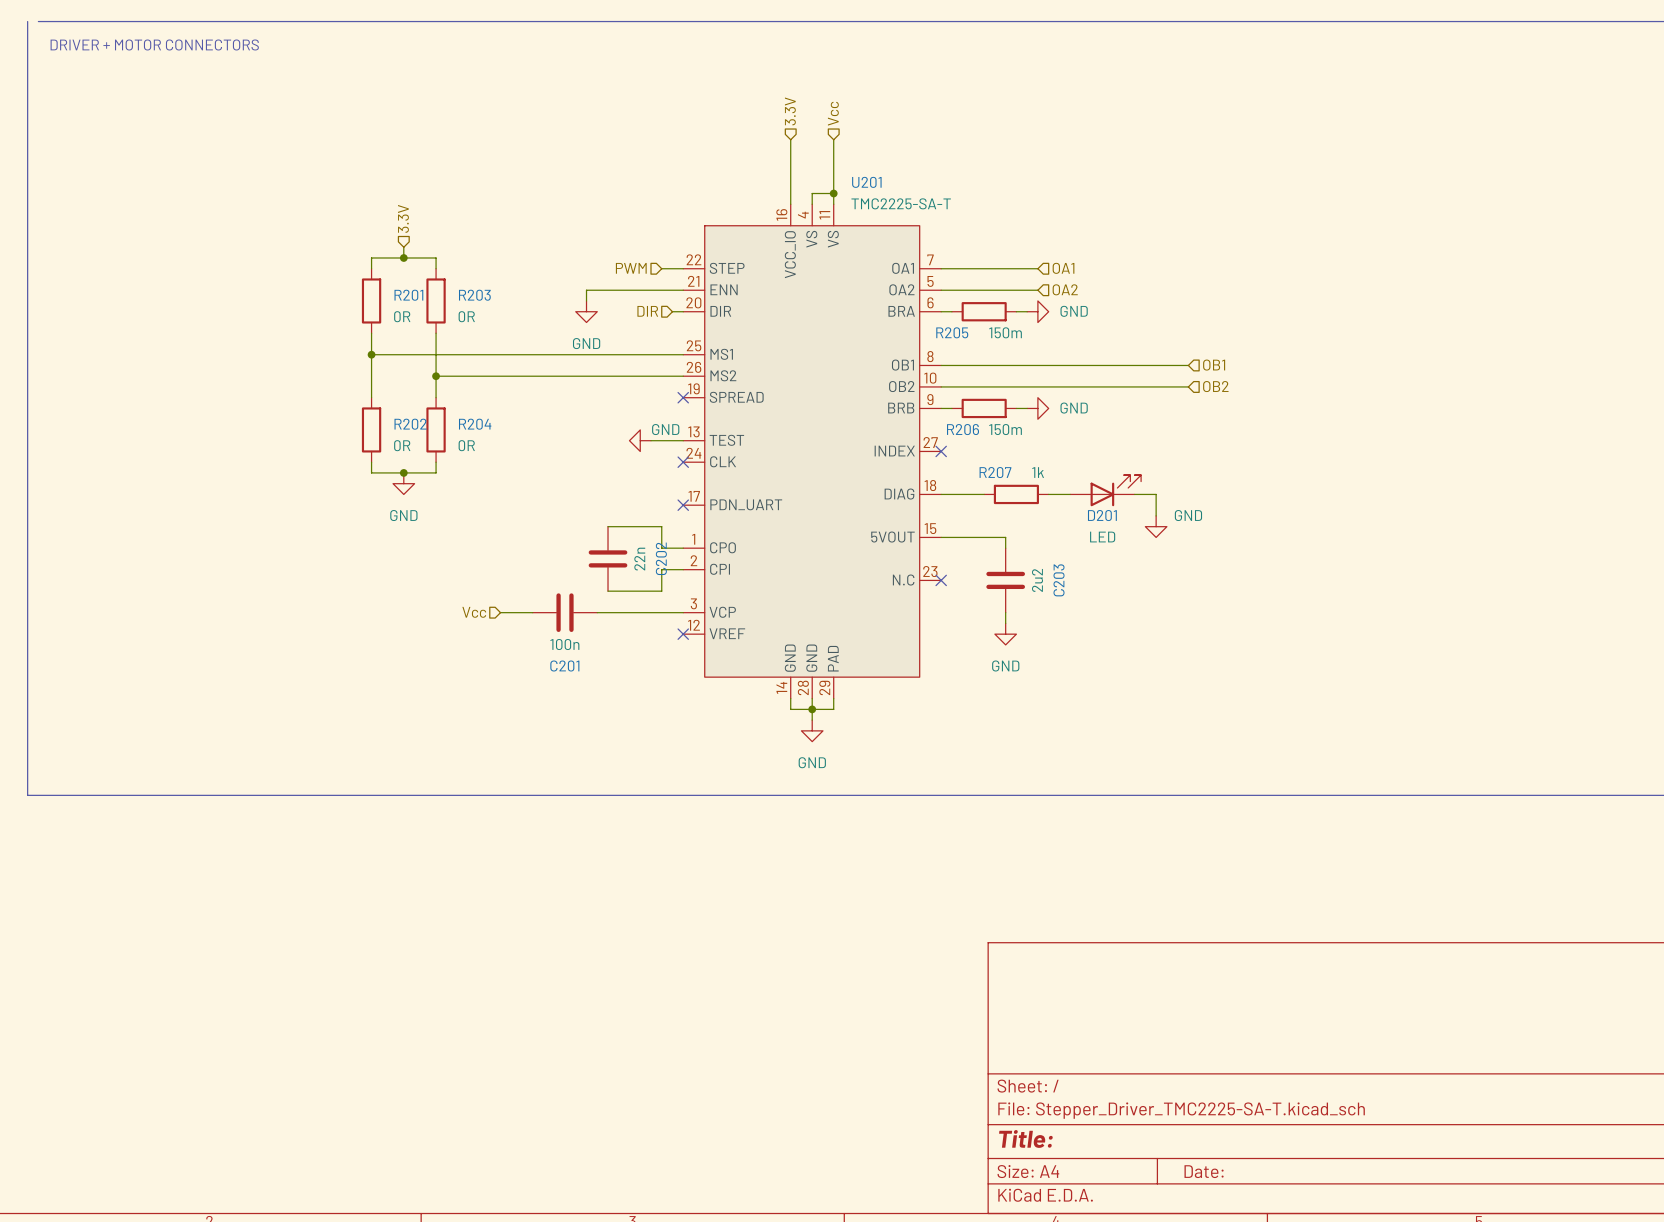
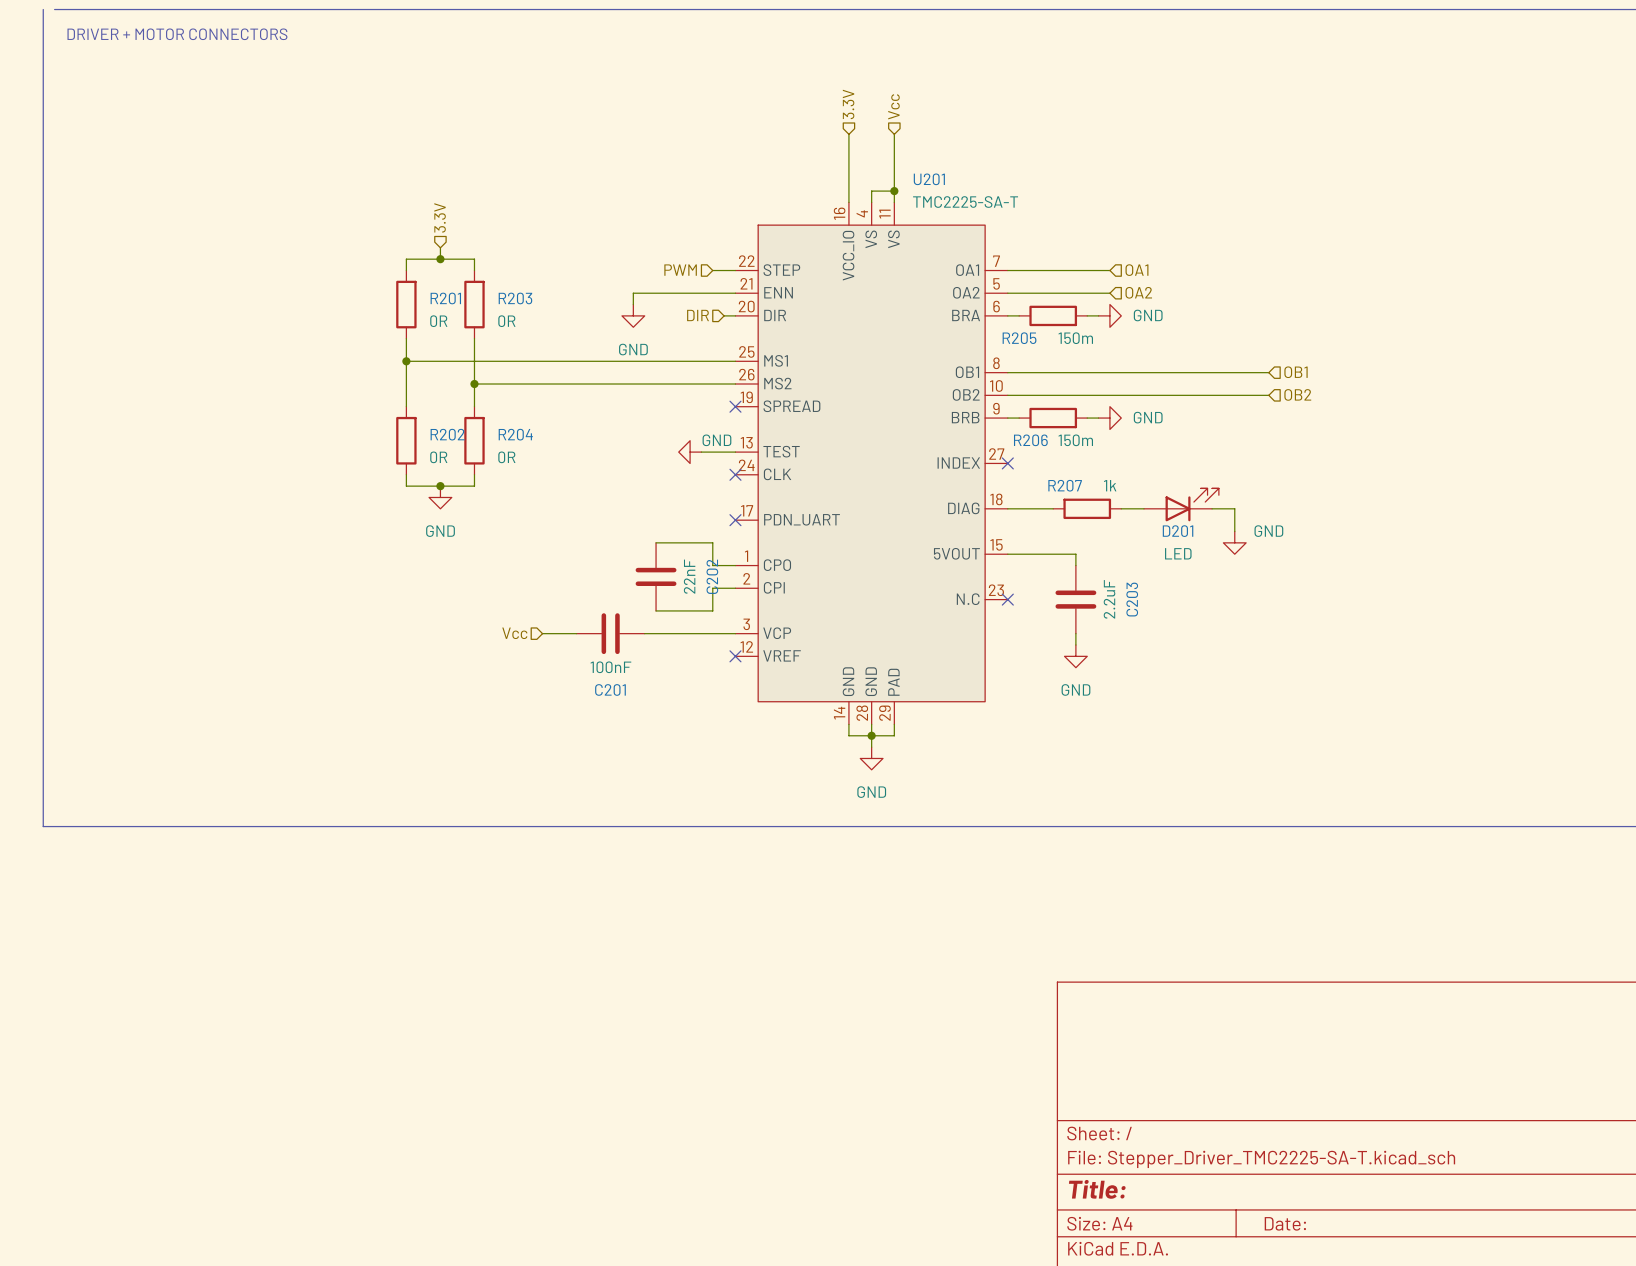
C202 value: 22n (639, 559) -> 22nF (689, 576)
C203 value: 2u2 (1037, 580) -> 2.2uF (1109, 599)
C201 value: 100n (564, 644) -> 100nF (610, 667)

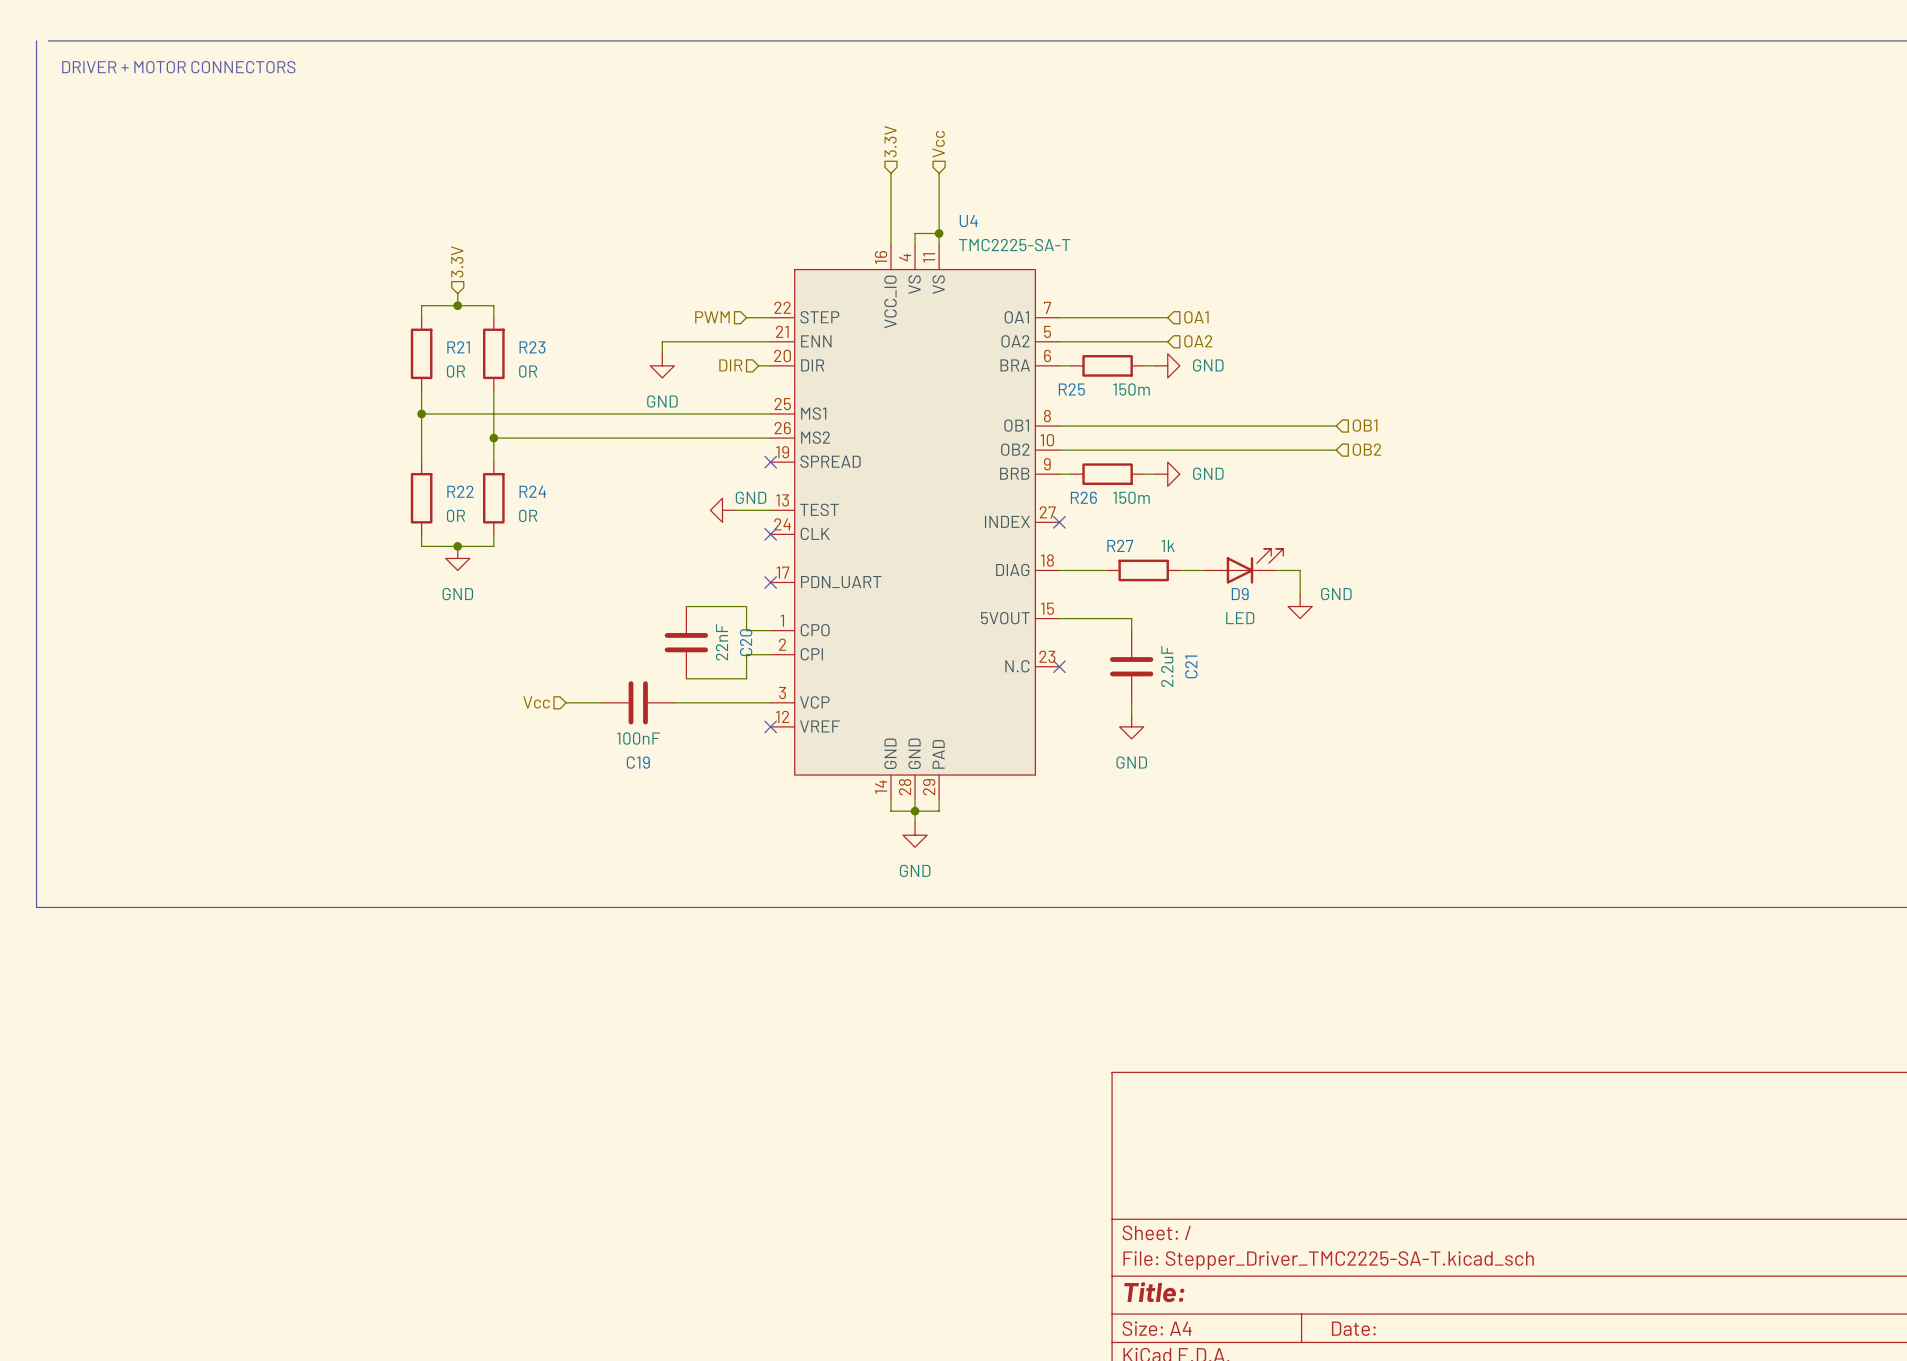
U201 name: U201 (929, 179) -> U4 (968, 221)
R201 name: R201 (445, 298) -> R21 (458, 347)
R203 name: R203 (515, 298) -> R23 (532, 347)
R205 name: R205 (1019, 338) -> R25 (1071, 389)
R202 name: R202 (447, 434) -> R22 (460, 491)
R204 name: R204 (515, 434) -> R24 (532, 491)
R206 name: R206 (1030, 440) -> R26 (1083, 497)
R207 name: R207 (1065, 485) -> R27 (1120, 545)
D201 name: D201 (1178, 531) -> D9 (1240, 594)
C202 name: C202 (712, 576) -> C20 (746, 642)
C203 name: C203 (1132, 599) -> C21 (1191, 666)
C201 name: C201 (610, 689) -> C19 (638, 762)

